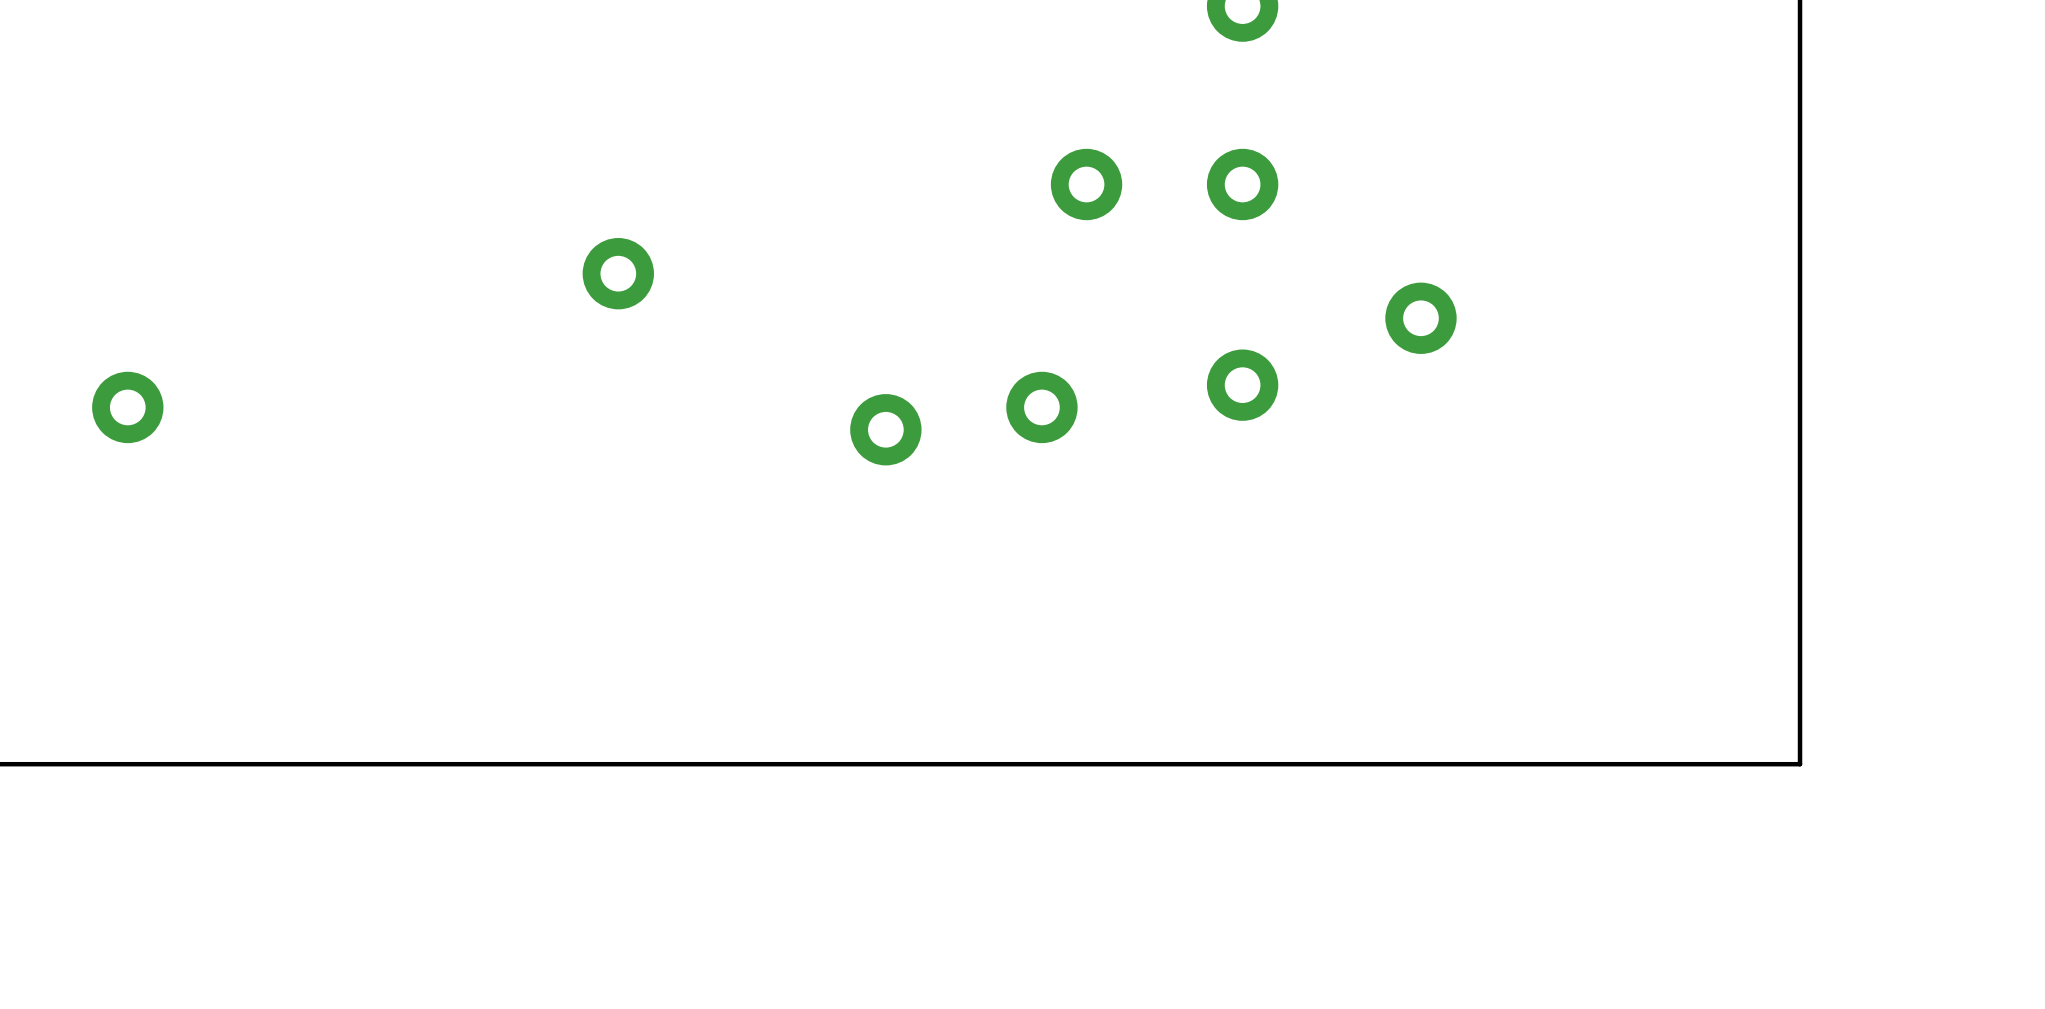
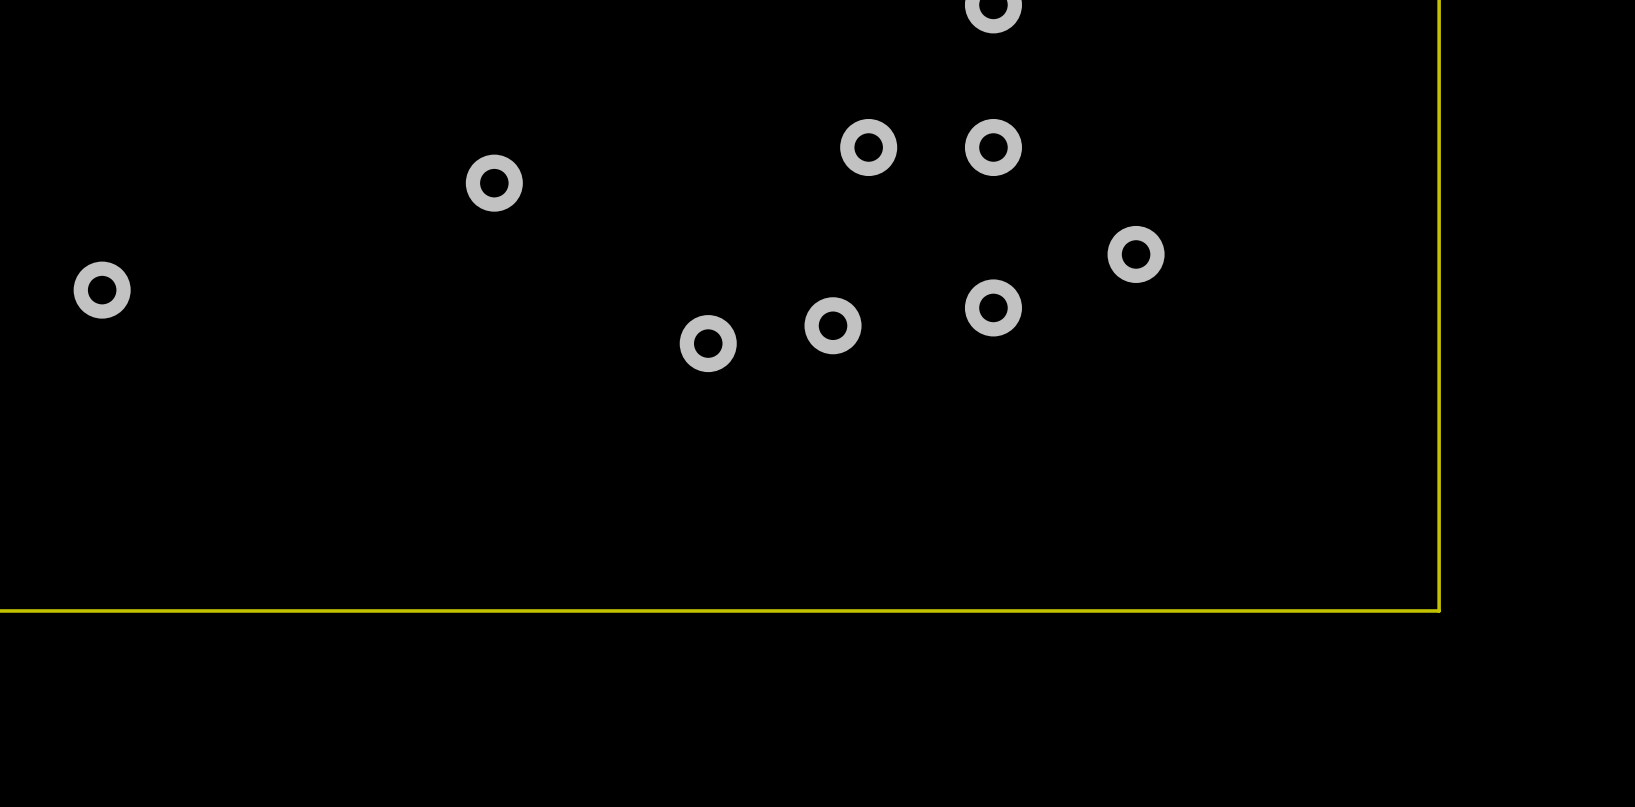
via position: (618, 273) -> (494, 183)
via position: (127, 407) -> (102, 290)

